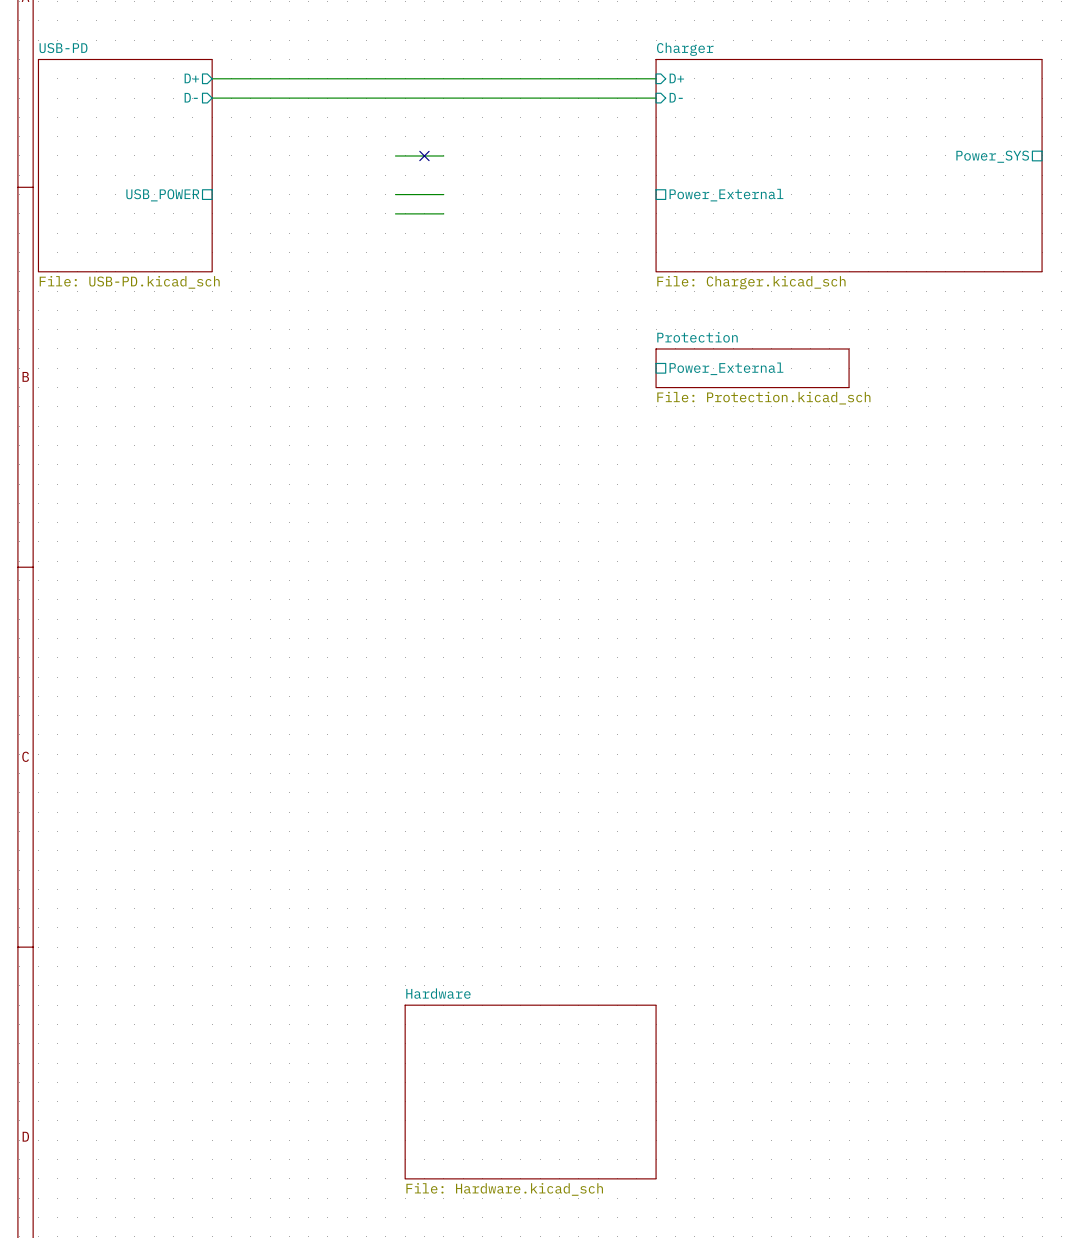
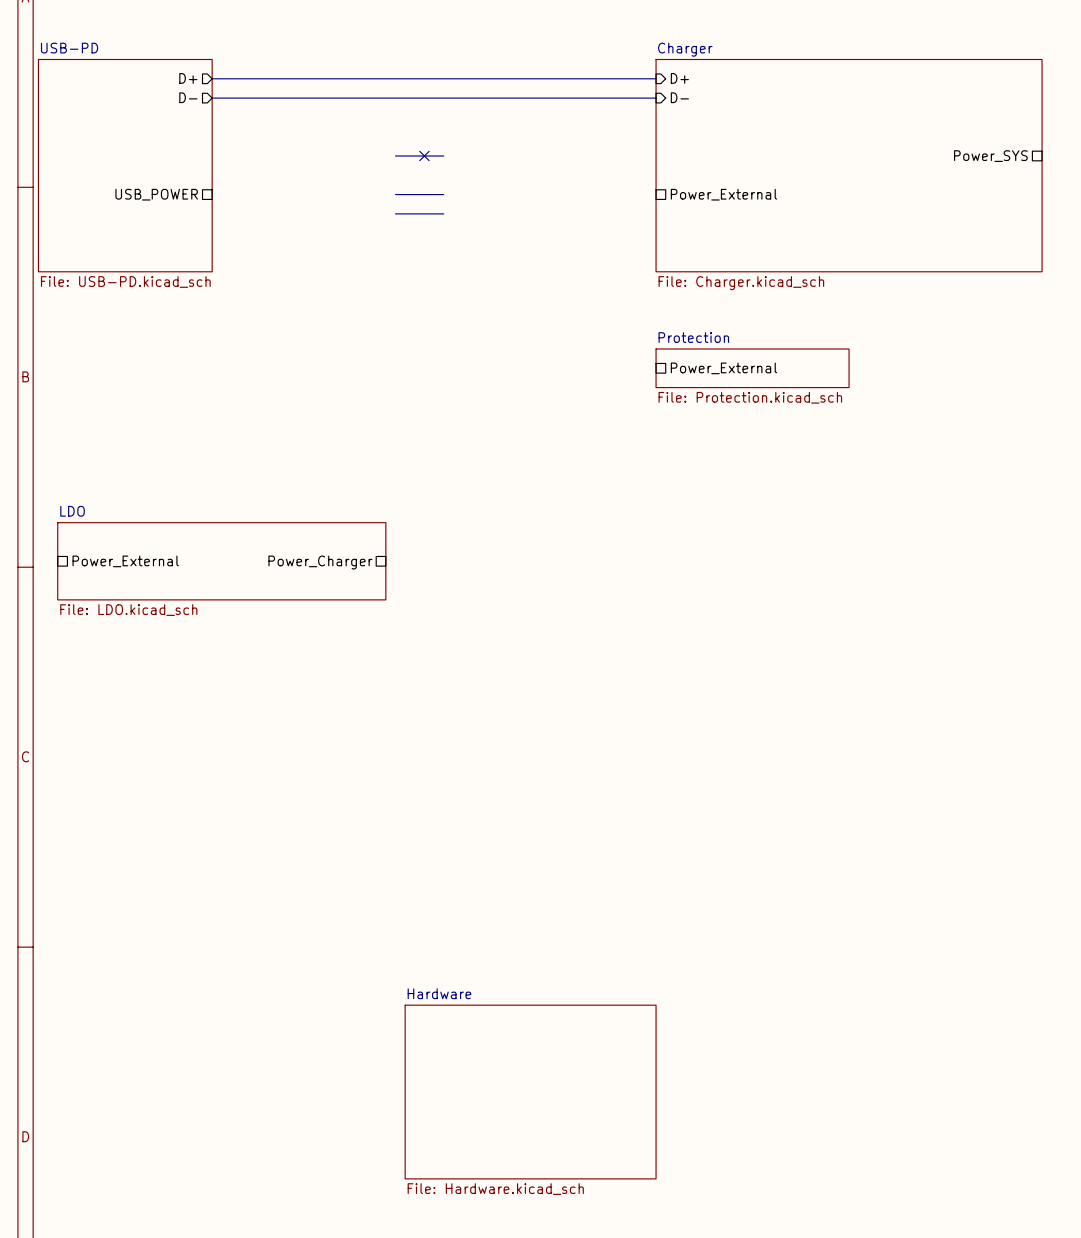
sheet pin: none -> Power_External (125, 561)
sheet LDO: none -> File: LDO.kicad_sch (221, 561)
sheet pin: none -> Power_Charger (320, 562)

